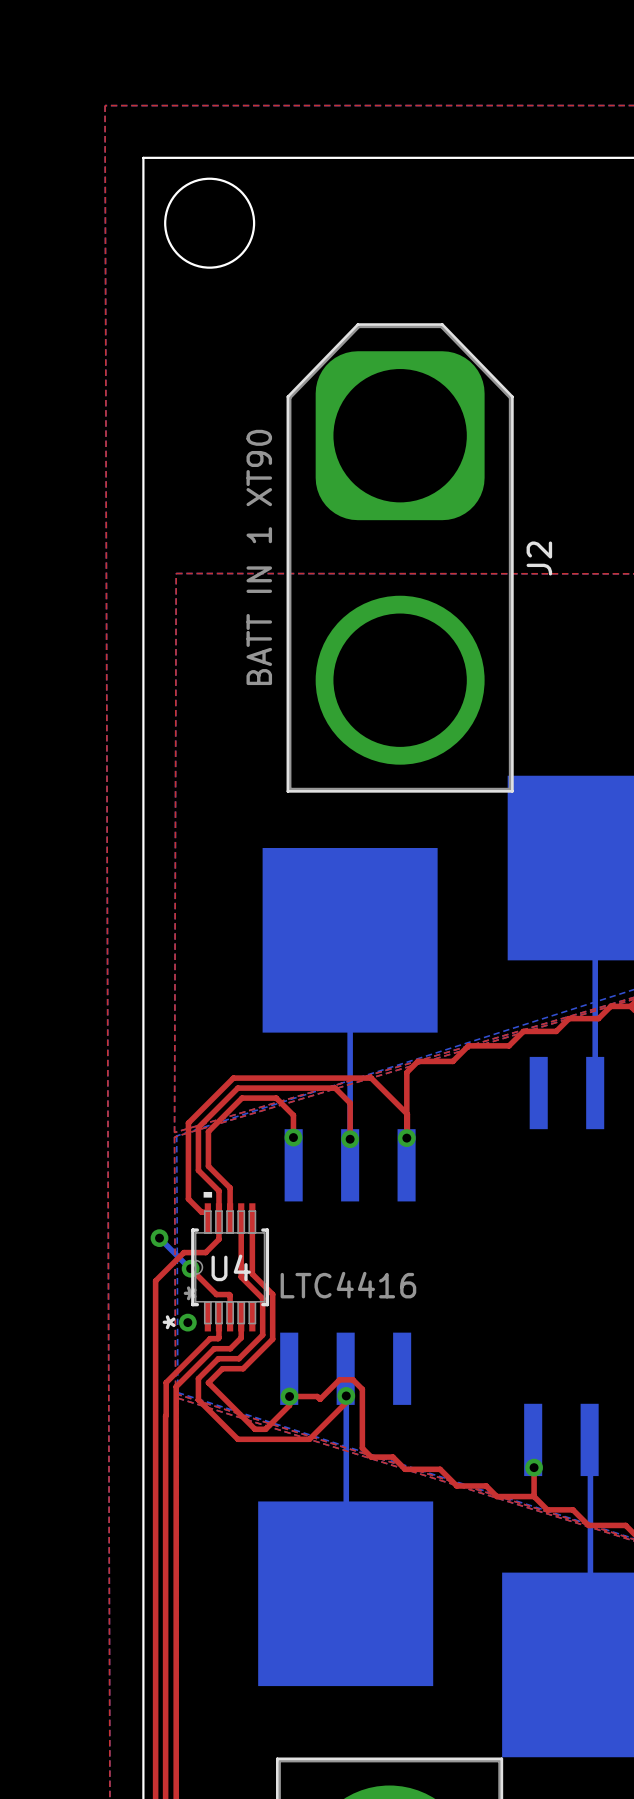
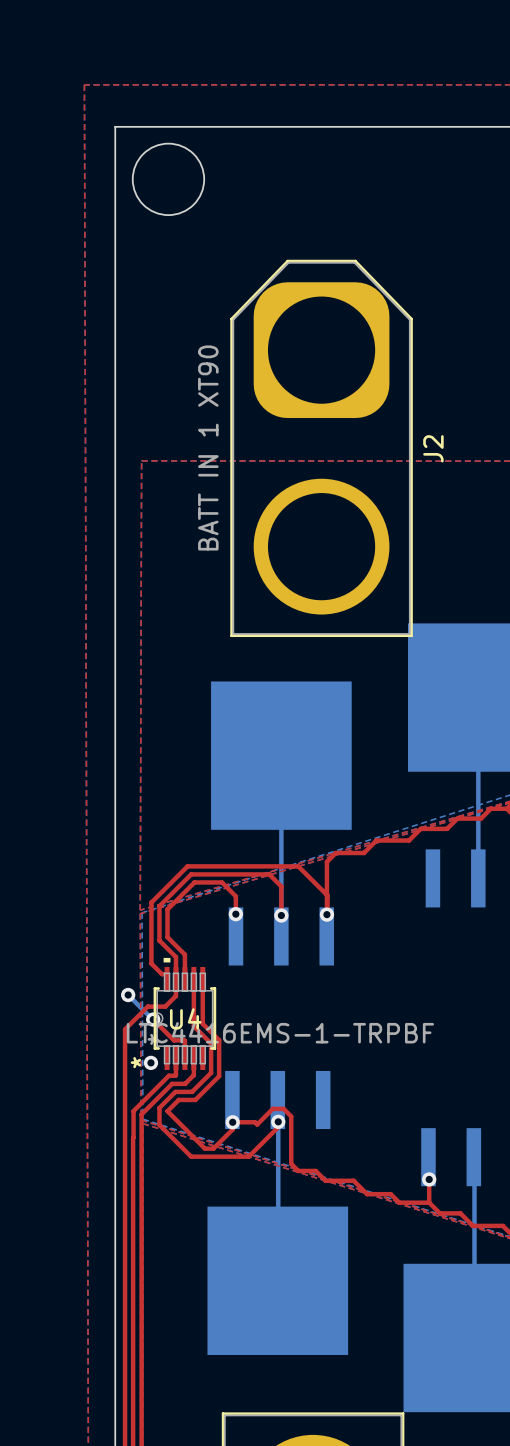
U4 value: LTC4416 (348, 1285) -> LTC4416EMS-1-TRPBF (280, 1032)

